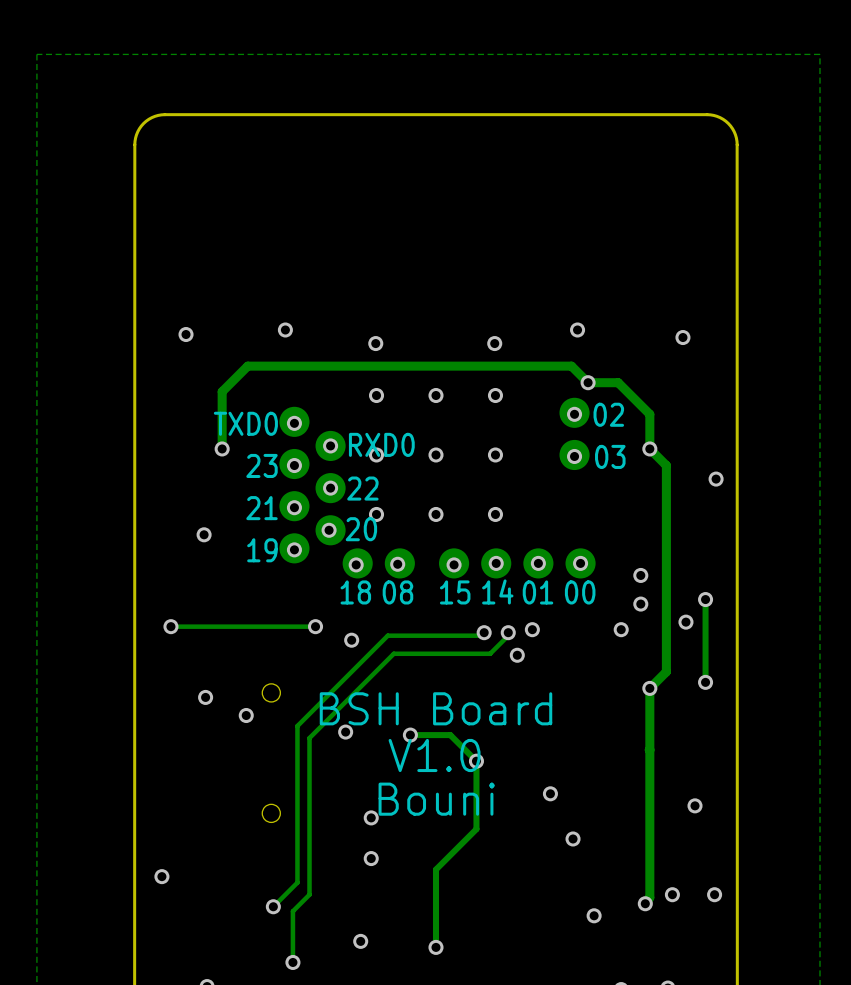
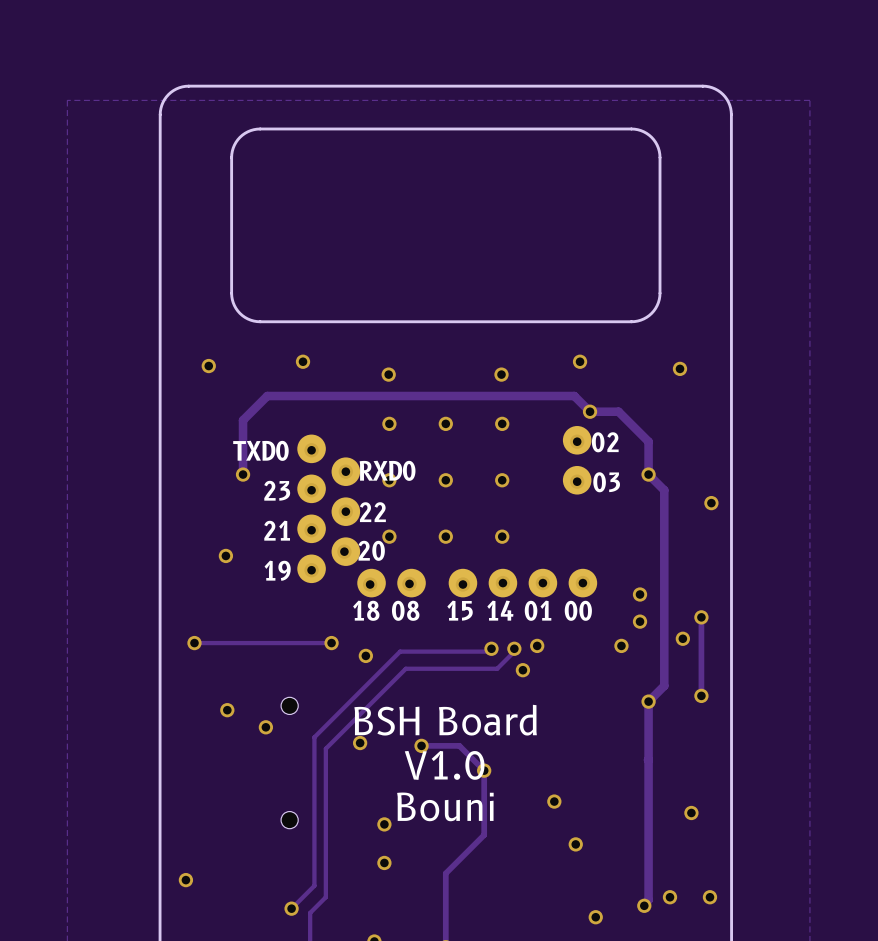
board edge: none -> (631, 128) (260, 128) (247, 131) (237, 139) (231, 154) (231, 293) (234, 305) (244, 317) (260, 321) (631, 321) (643, 318) (655, 308) (659, 296) (659, 154) (657, 145) (649, 135) (640, 130) (631, 128)
board edge: (737, 144) (735, 134) (728, 123) (720, 117) (707, 114) (164, 114) (154, 116) (143, 123) (137, 131) (134, 144) -> (731, 186) (730, 108) (727, 99) (720, 92) (712, 87) (702, 86) (182, 86) (168, 94) (160, 108) (160, 186)

